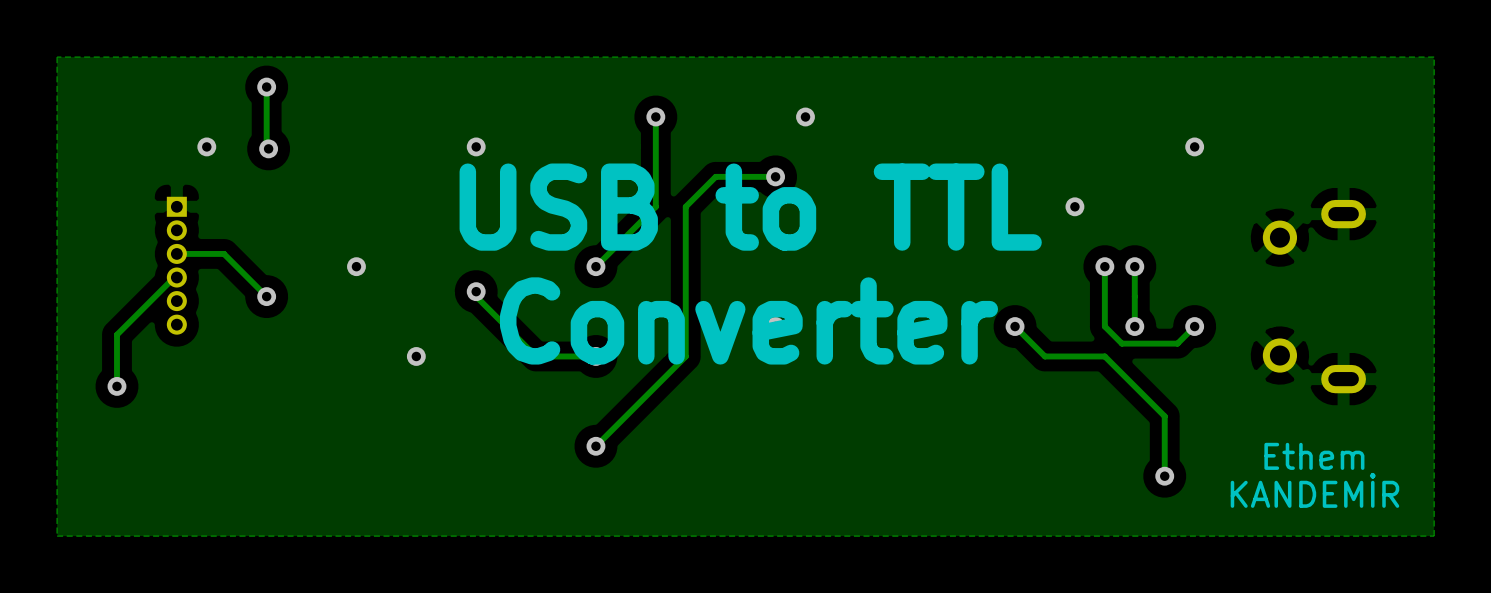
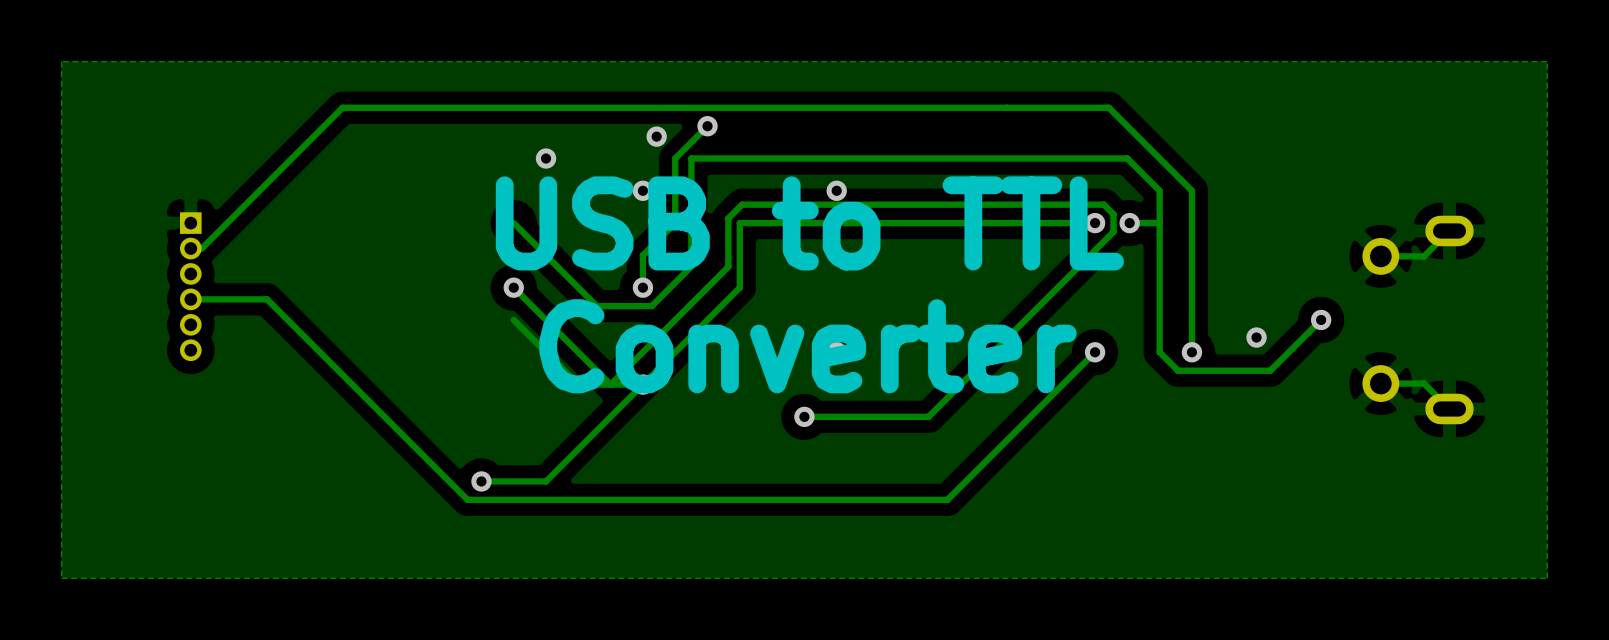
track: (266, 87) (266, 146) (268, 148) -> none
via: (266, 87) -> none
track: (655, 116) (655, 206) (595, 266) -> (707, 126) (675, 158) (675, 223) (642, 255) (642, 287)
via: (805, 116) -> none
via: none -> (656, 136)
via: (206, 146) -> none
via position: (476, 146) -> (546, 158)
via: (1194, 146) -> none
via: (268, 148) -> none
via: none -> (642, 190)
track: (775, 176) (715, 176) (685, 206) -> (1095, 223) (739, 223)
via: none -> (1095, 223)
track: none -> (1159, 223) (1127, 223)
via position: (1074, 206) -> (1129, 223)
track: none -> (1449, 230) (1424, 256) (1380, 256)
track: none -> (190, 248) (201, 248) (342, 107) (1108, 107) (1191, 190) (1191, 287)
track: (176, 253) (224, 253) (247, 277) -> (190, 299) (267, 299)
via: (356, 266) -> none
track: none -> (513, 287) (610, 384) (728, 266) (728, 218) (742, 204) (1103, 204) (1113, 214) (1113, 231) (928, 416) (804, 416)
track: (685, 266) (685, 356) (595, 446) -> (739, 287) (546, 481) (481, 481)
via: (1104, 266) -> none
track: (1134, 266) (1134, 326) -> none
via: (1134, 266) -> none
track: (176, 277) (174, 277) (116, 334) (116, 386) -> none
via position: (476, 291) -> (513, 287)
via: (266, 296) -> none
track: none -> (1321, 319) (1288, 352)
via: none -> (1321, 319)
via: none -> (1256, 337)
track: (1015, 326) (1044, 356) (1104, 356) (1164, 416) (1164, 476) -> (1095, 352) (947, 499) (467, 499) (287, 319)
track: (1104, 326) (1121, 343) -> (513, 223) (596, 306) (651, 306) (691, 266) (691, 158) (1127, 158) (1159, 190) (1159, 352) (1178, 370) (1210, 370)
via: none -> (1191, 352)
via: (1134, 326) -> none
via: (1194, 326) -> none
track: none -> (1380, 383) (1424, 383) (1449, 408)
via: (416, 356) -> none
via: (116, 386) -> none
via: none -> (804, 416)
via: none -> (481, 481)
via: (595, 446) -> none
text: Ethem (1314, 456) -> none
via: (1164, 476) -> none
text: KANDEMİR (1314, 490) -> none

